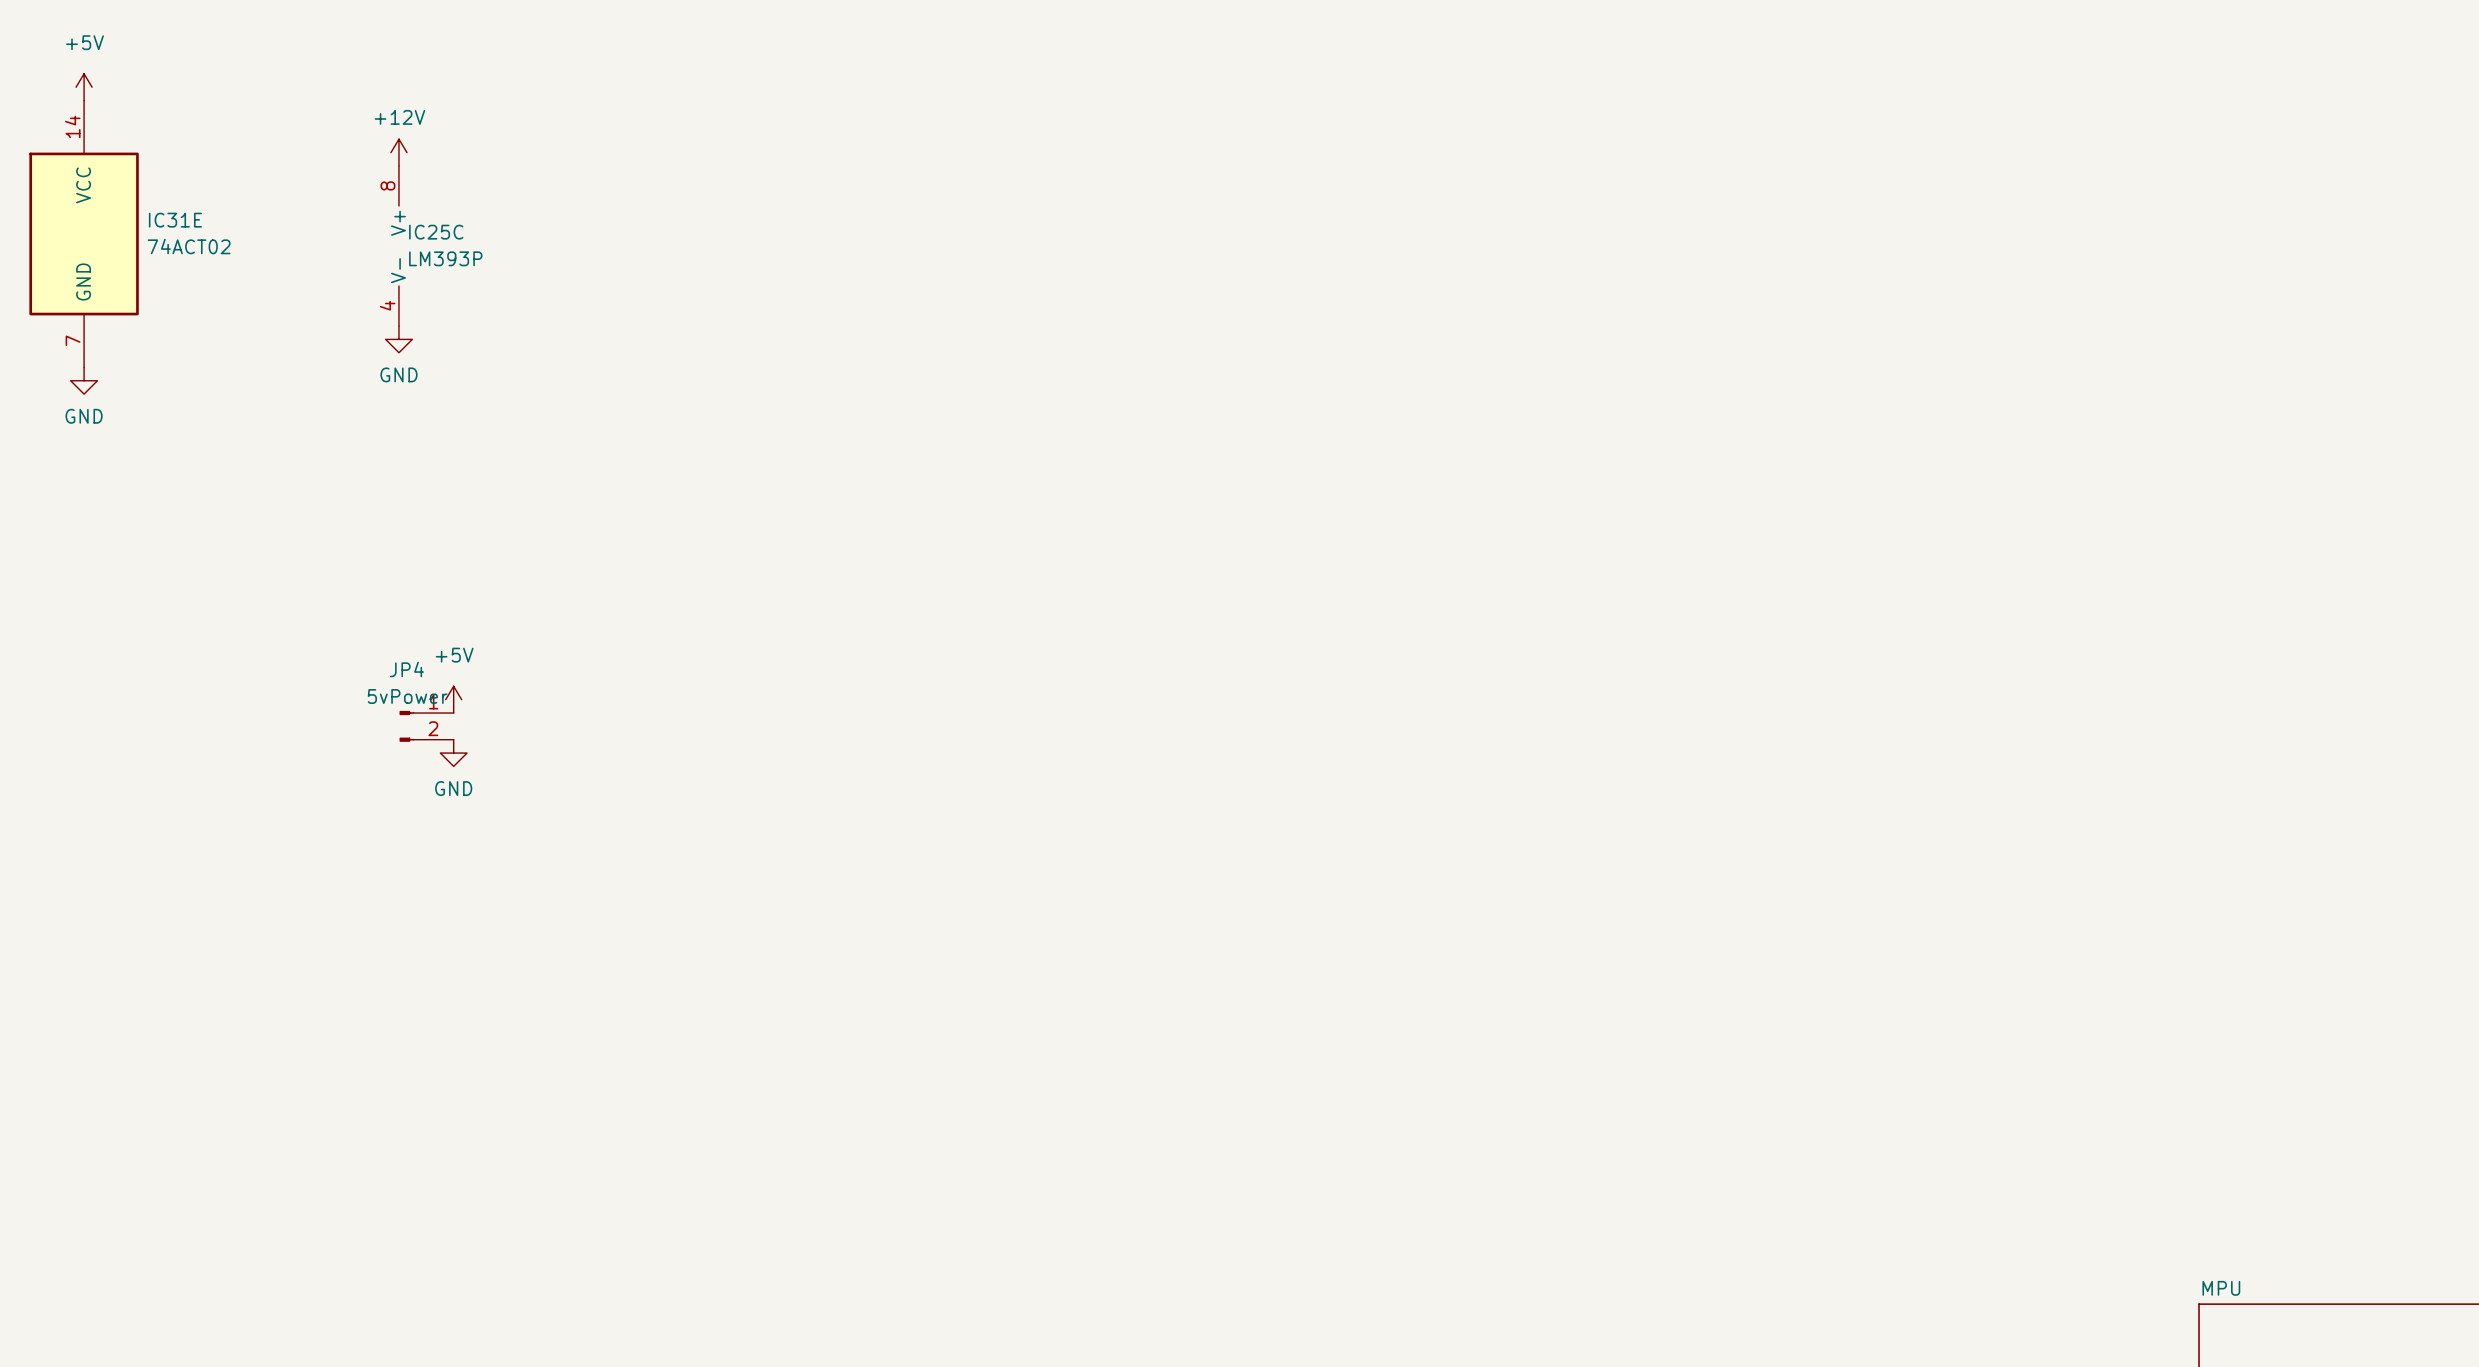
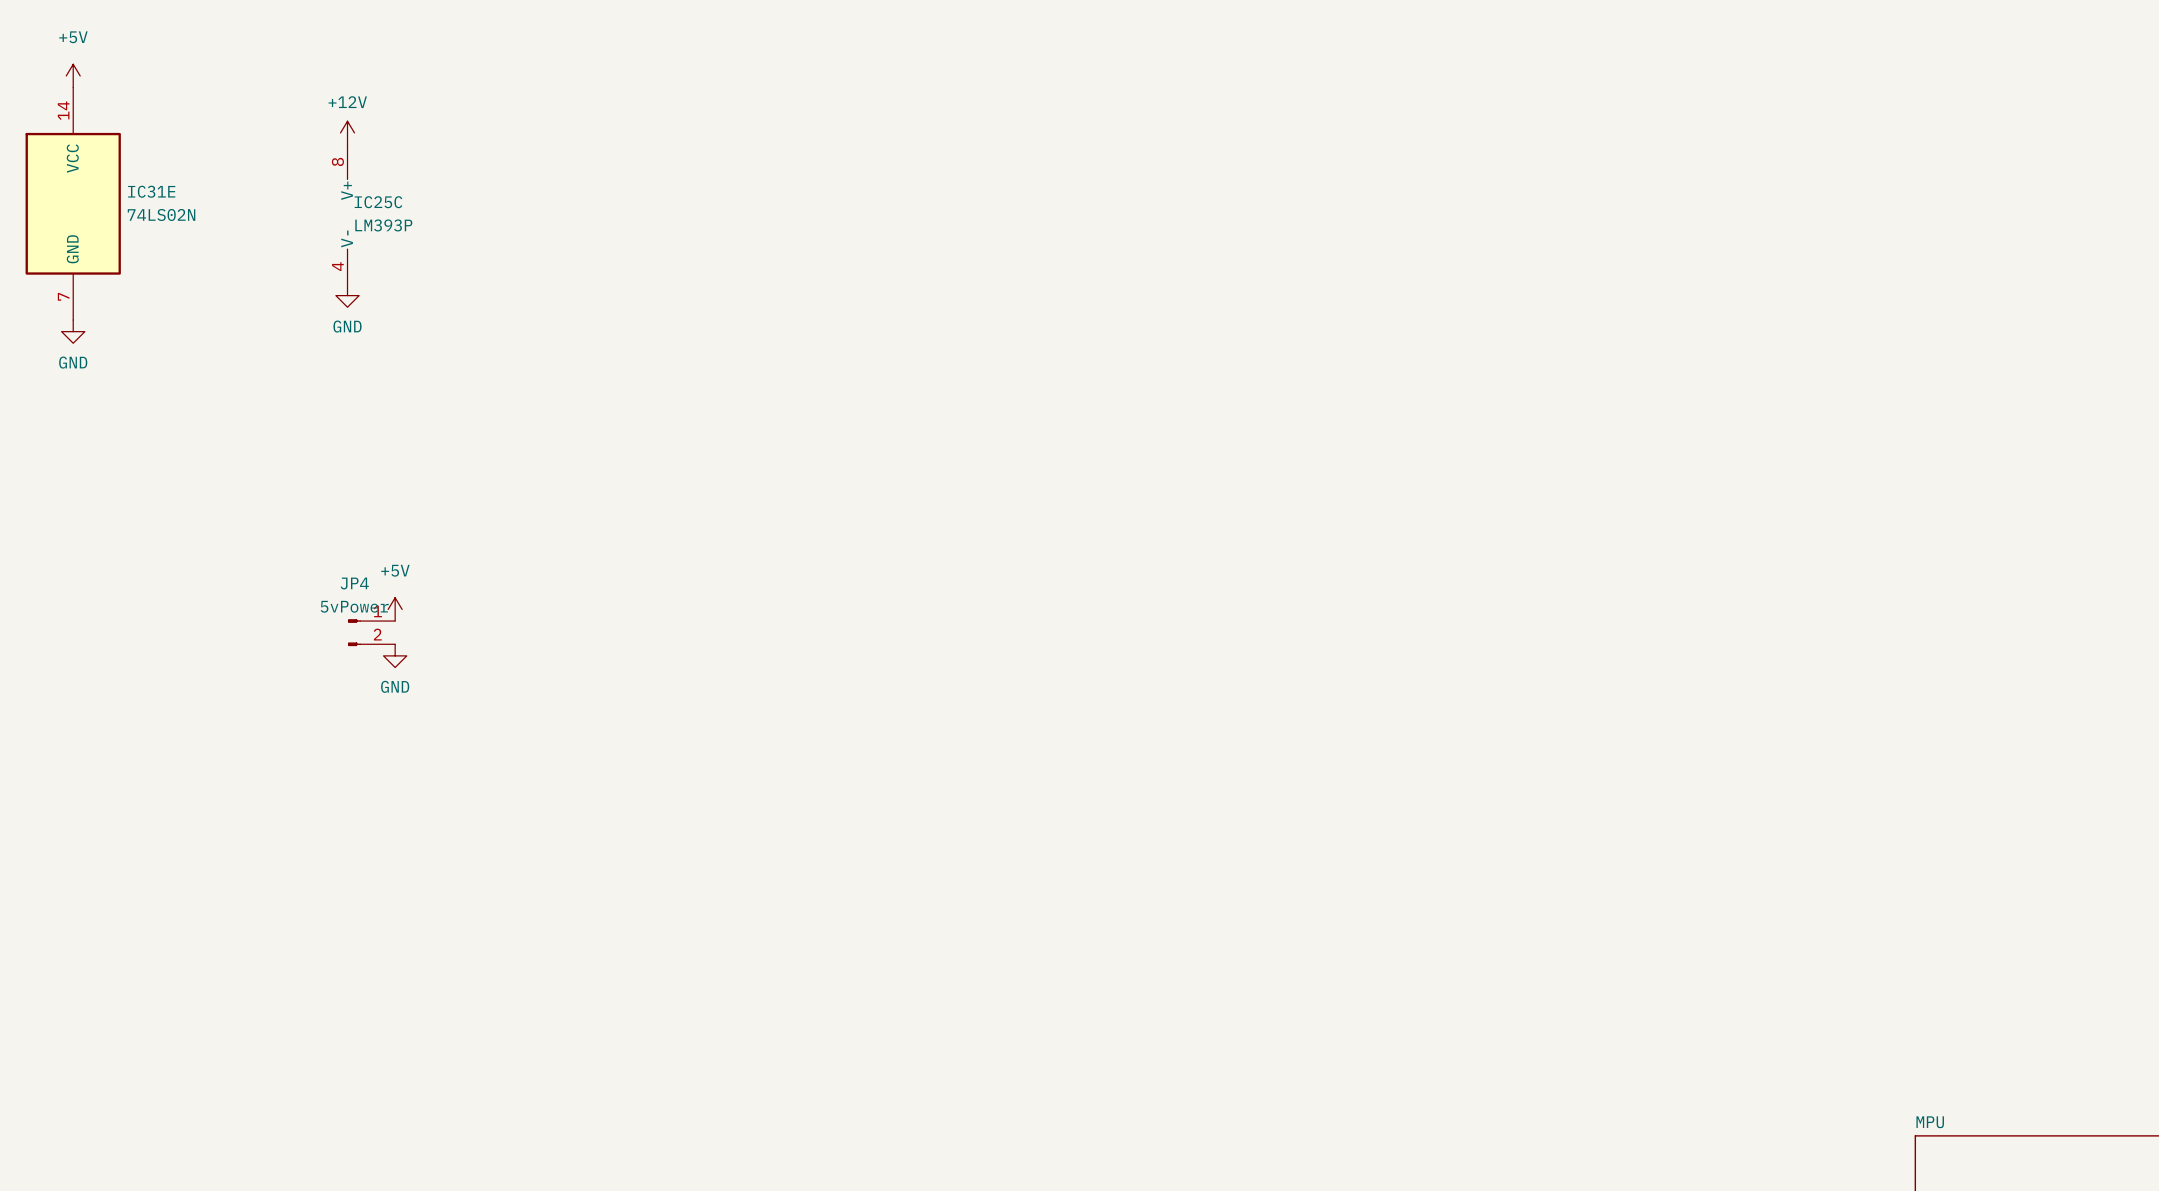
IC31E value: 74ACT02 (189, 246) -> 74LS02N (161, 214)

